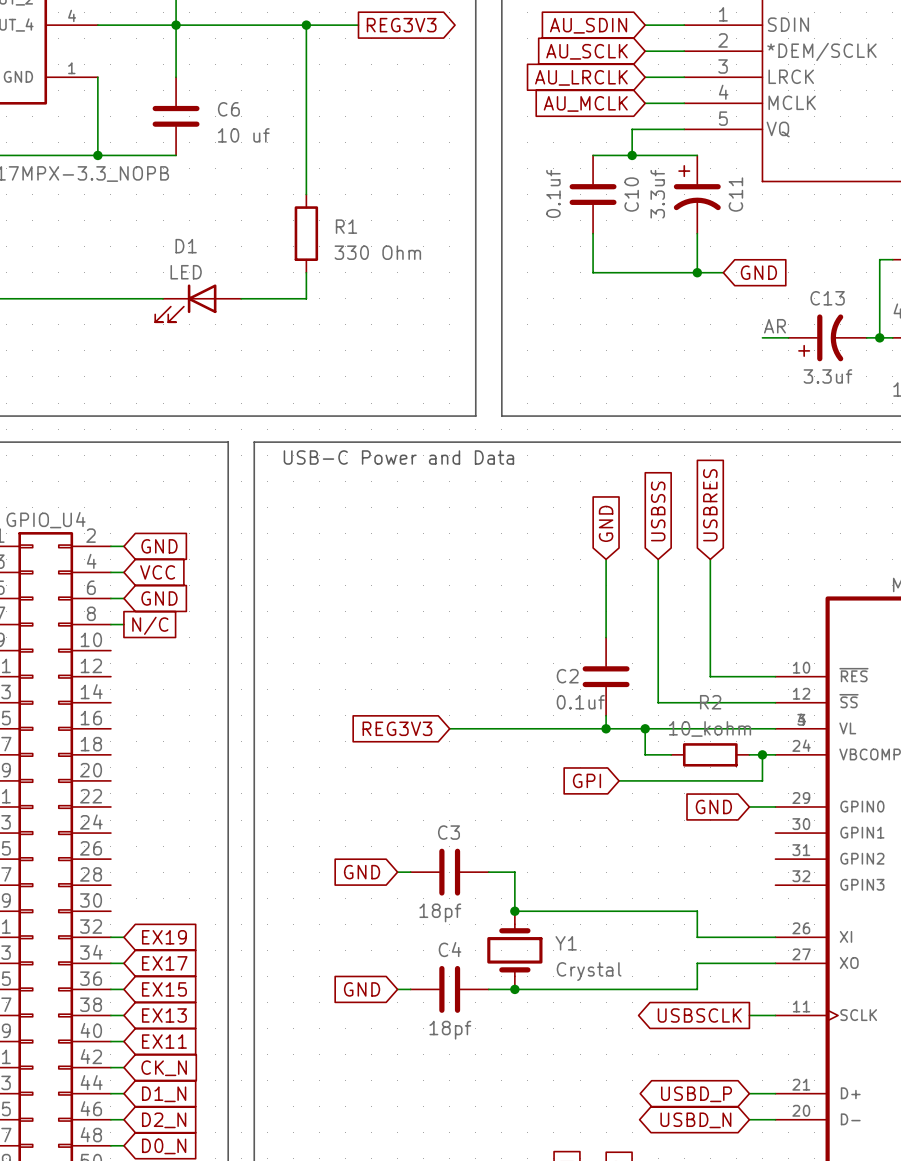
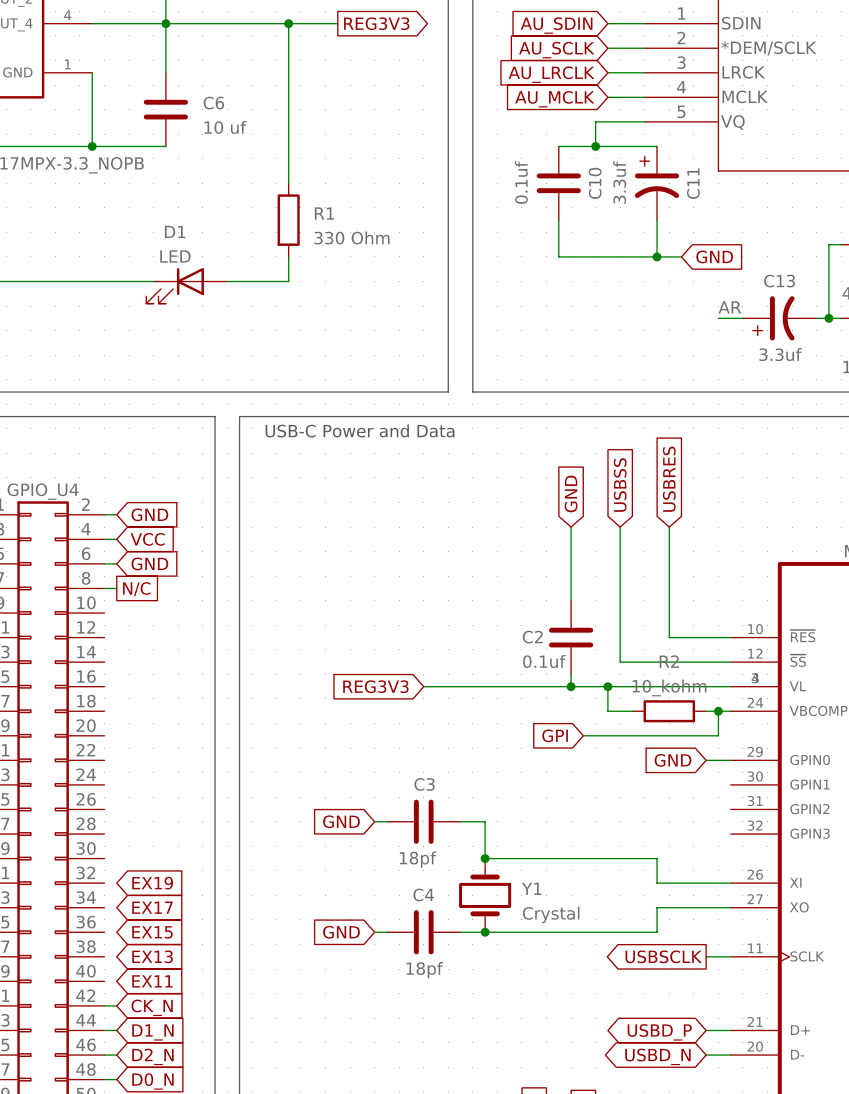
wire: (110, 937) (123, 937) -> none
wire: (110, 963) (123, 963) -> none
wire: (110, 989) (123, 989) -> none
wire: (110, 1015) (123, 1015) -> none
wire: (110, 1041) (123, 1041) -> none

